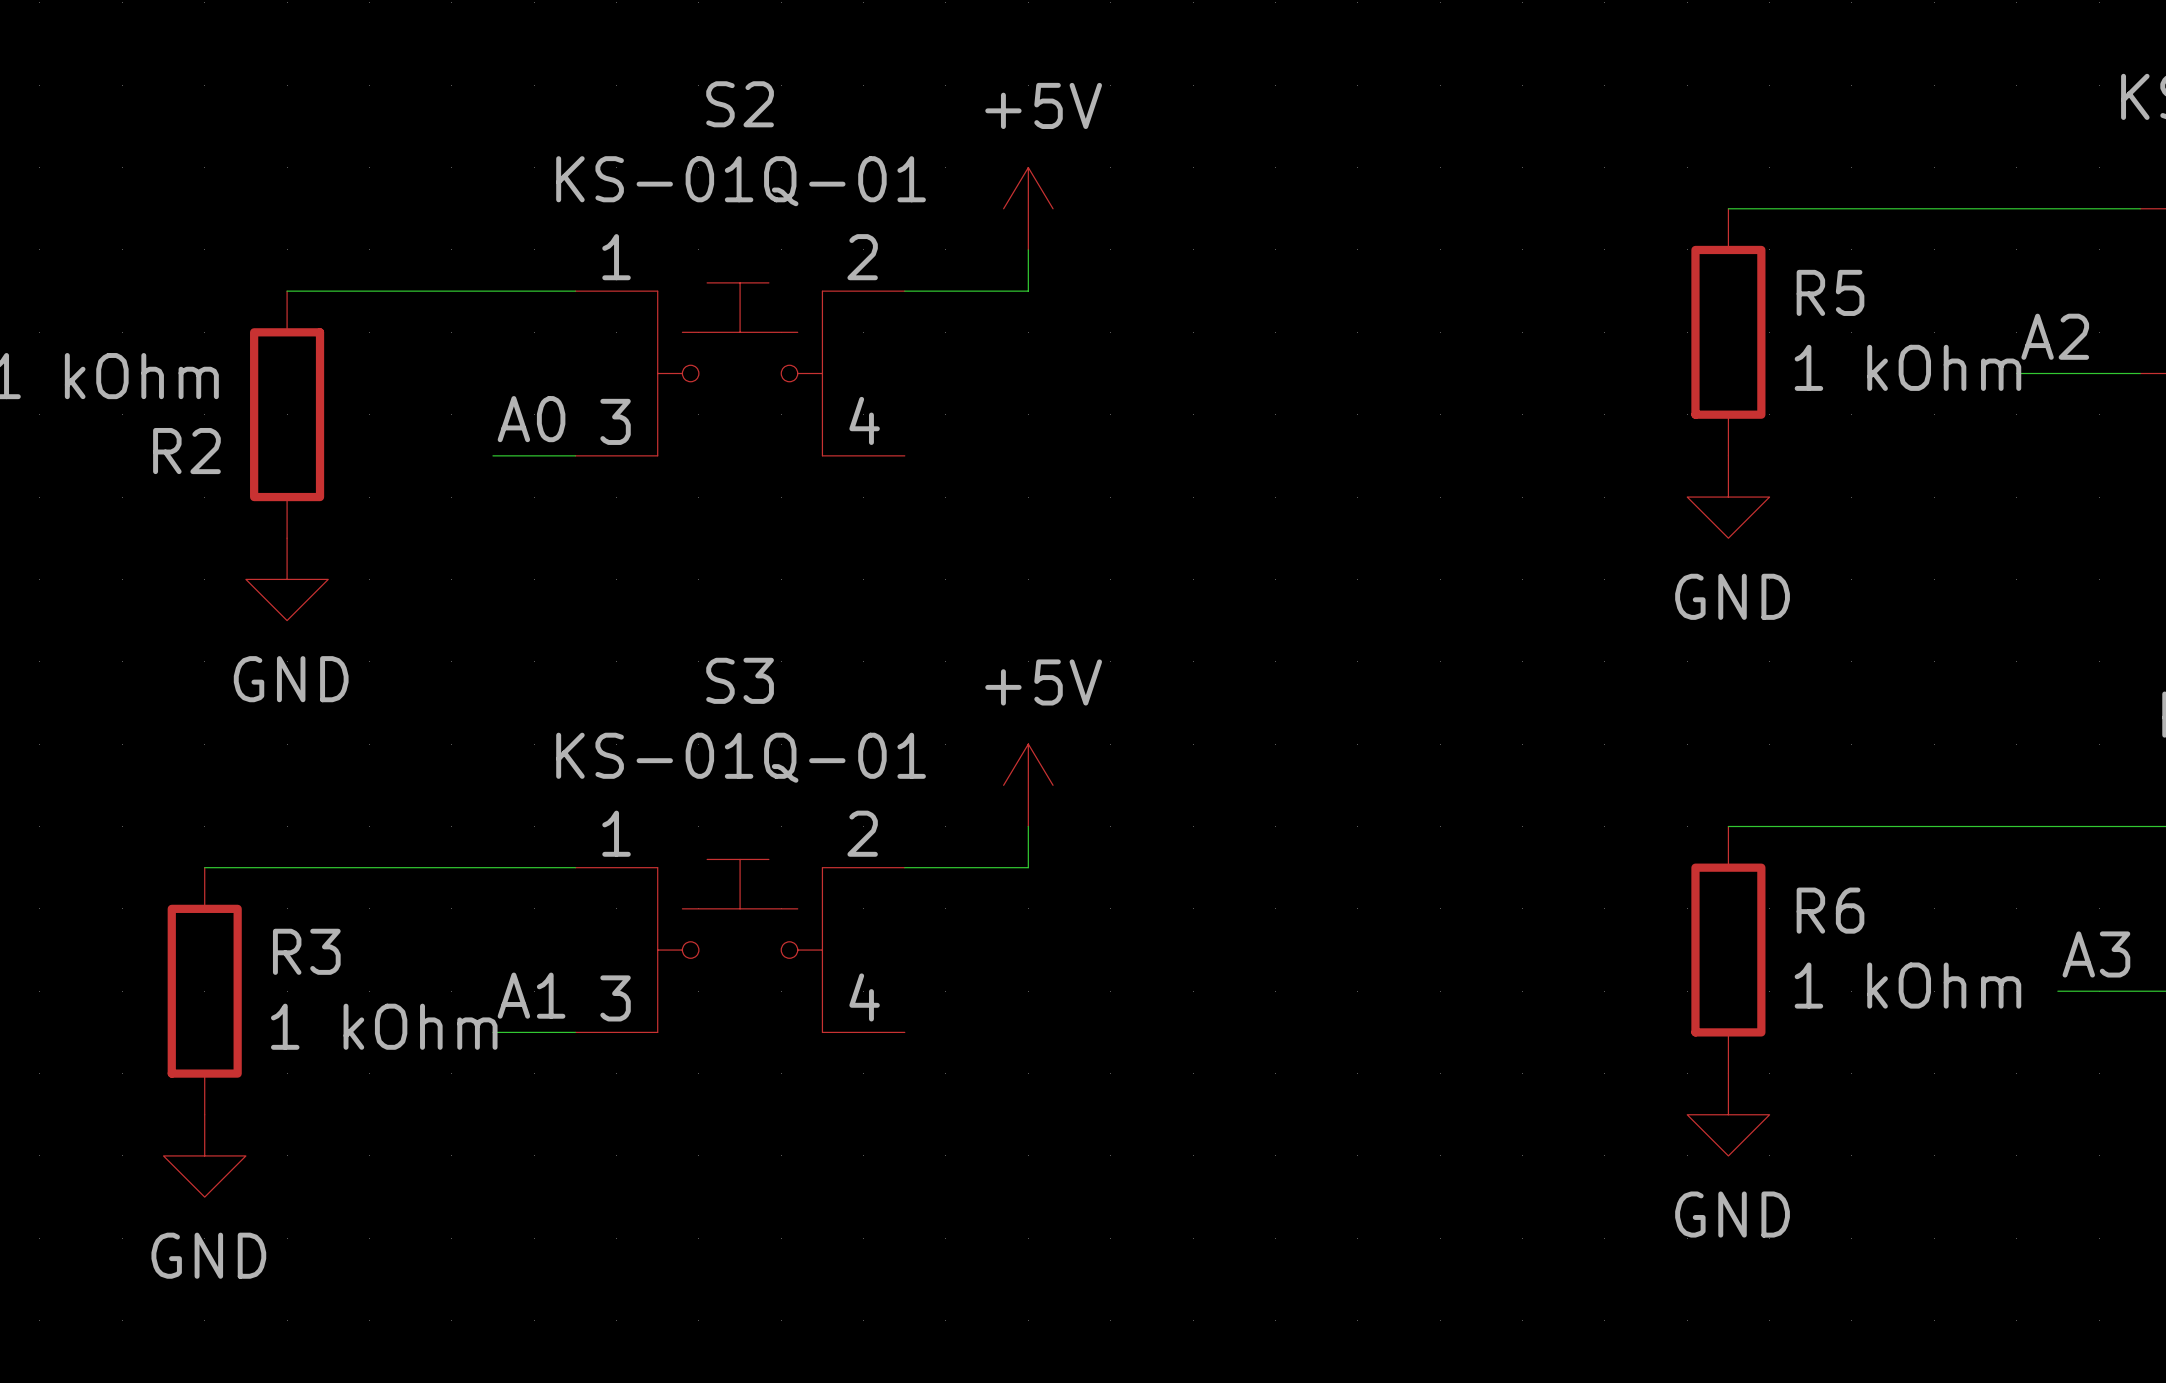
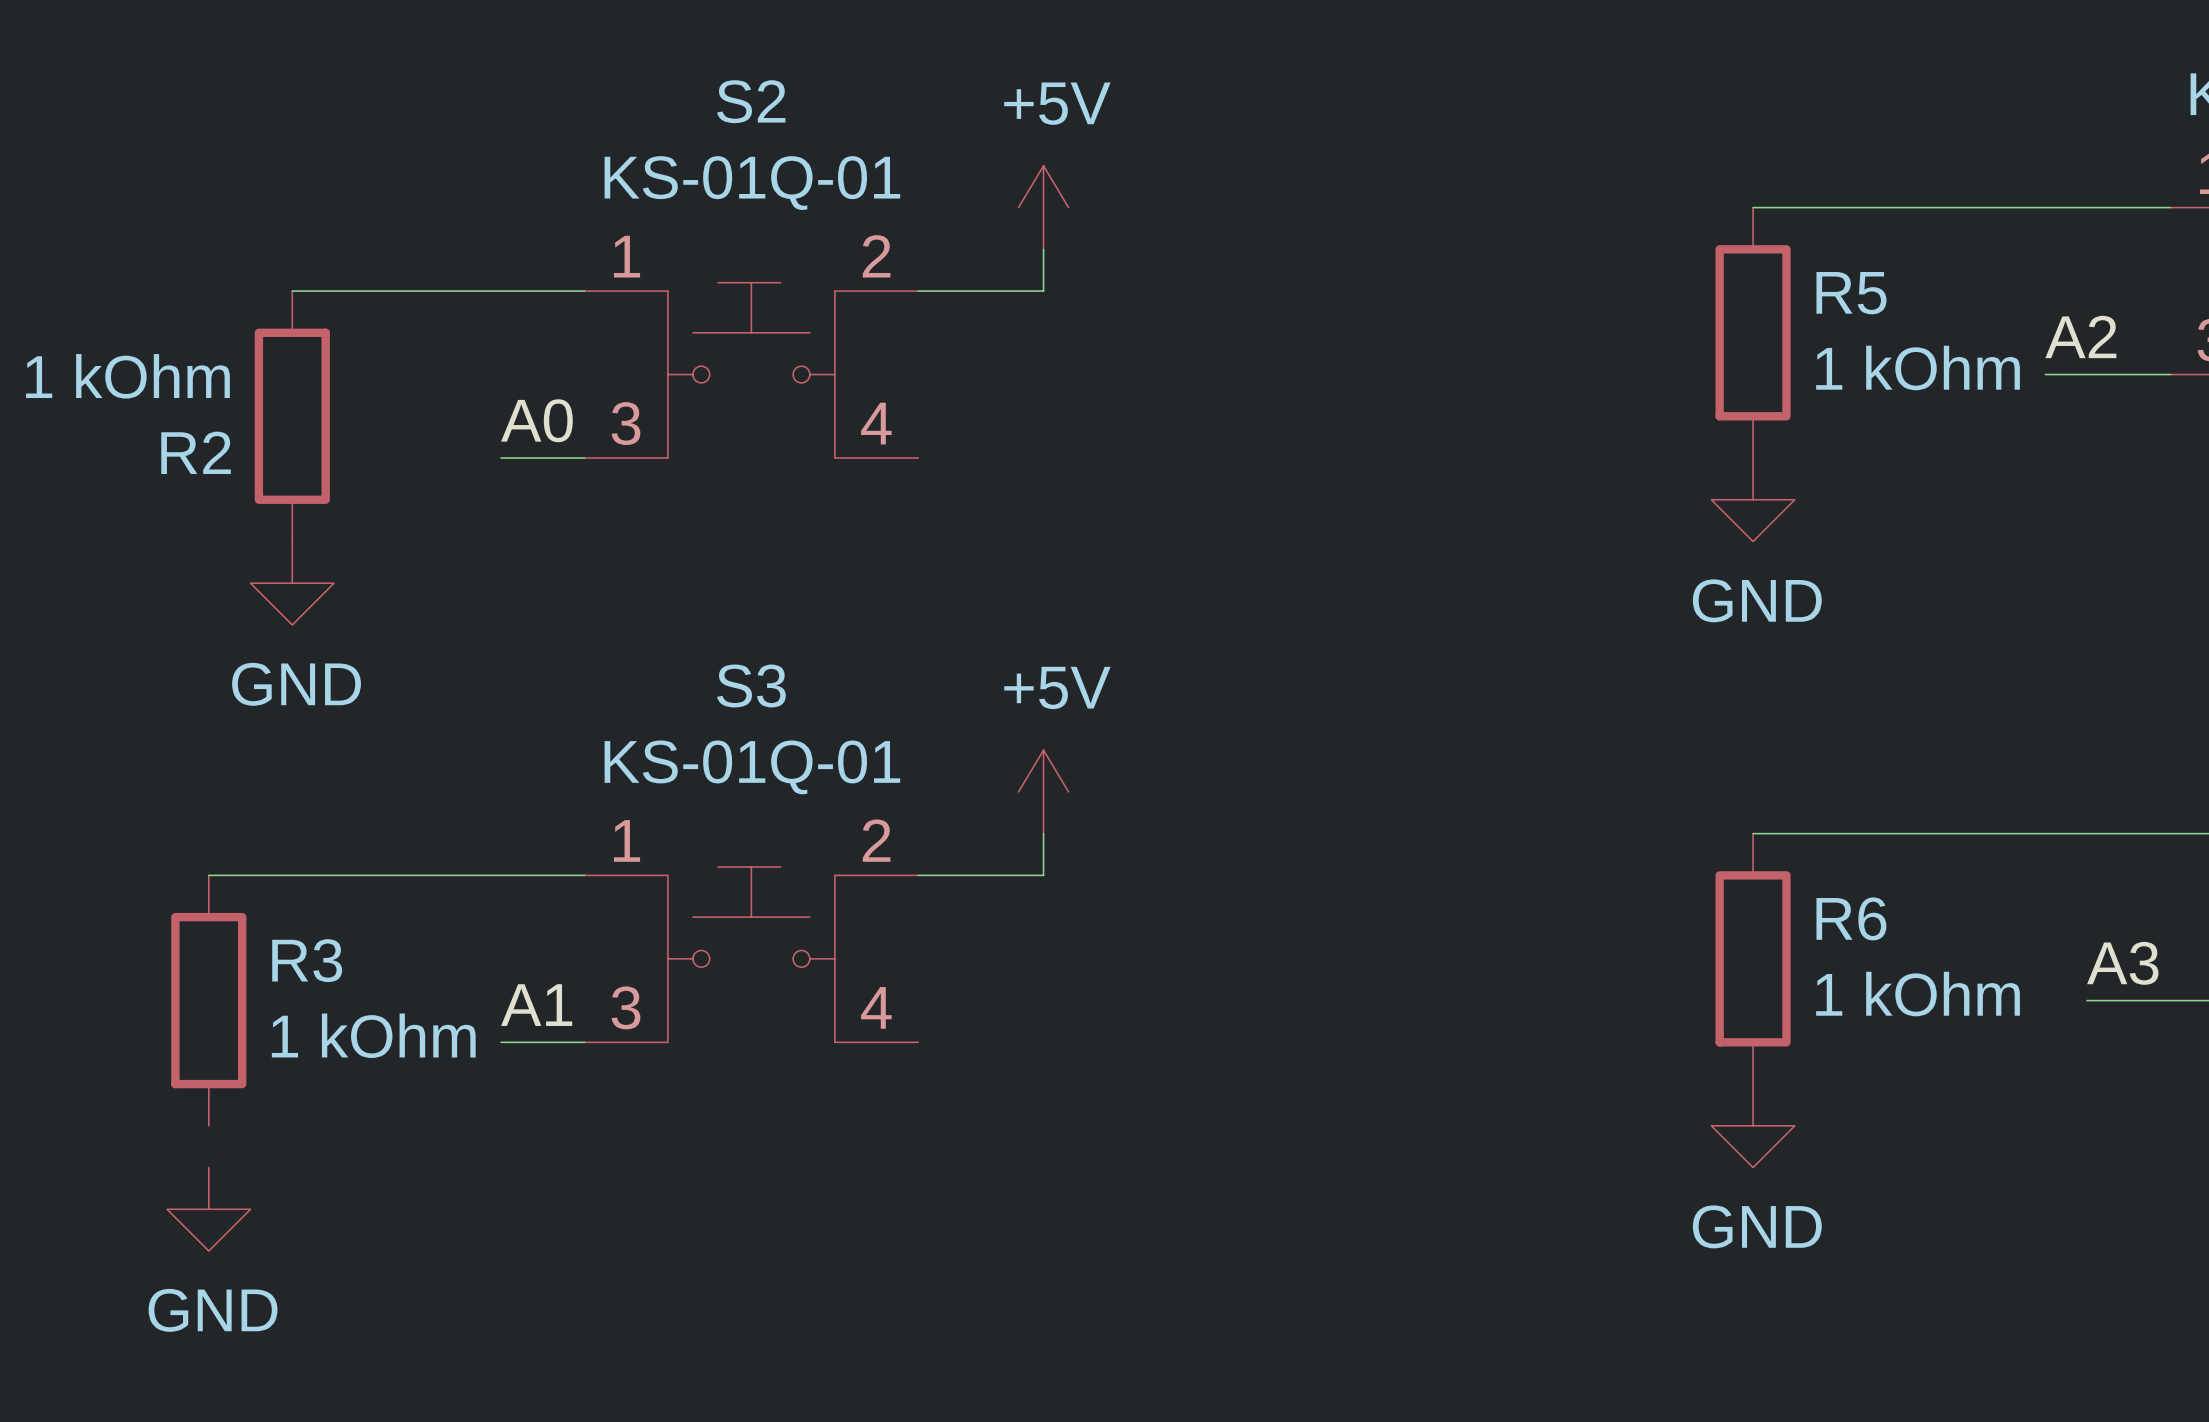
power symbol position: GND (204, 1155) -> GND (208, 1209)

